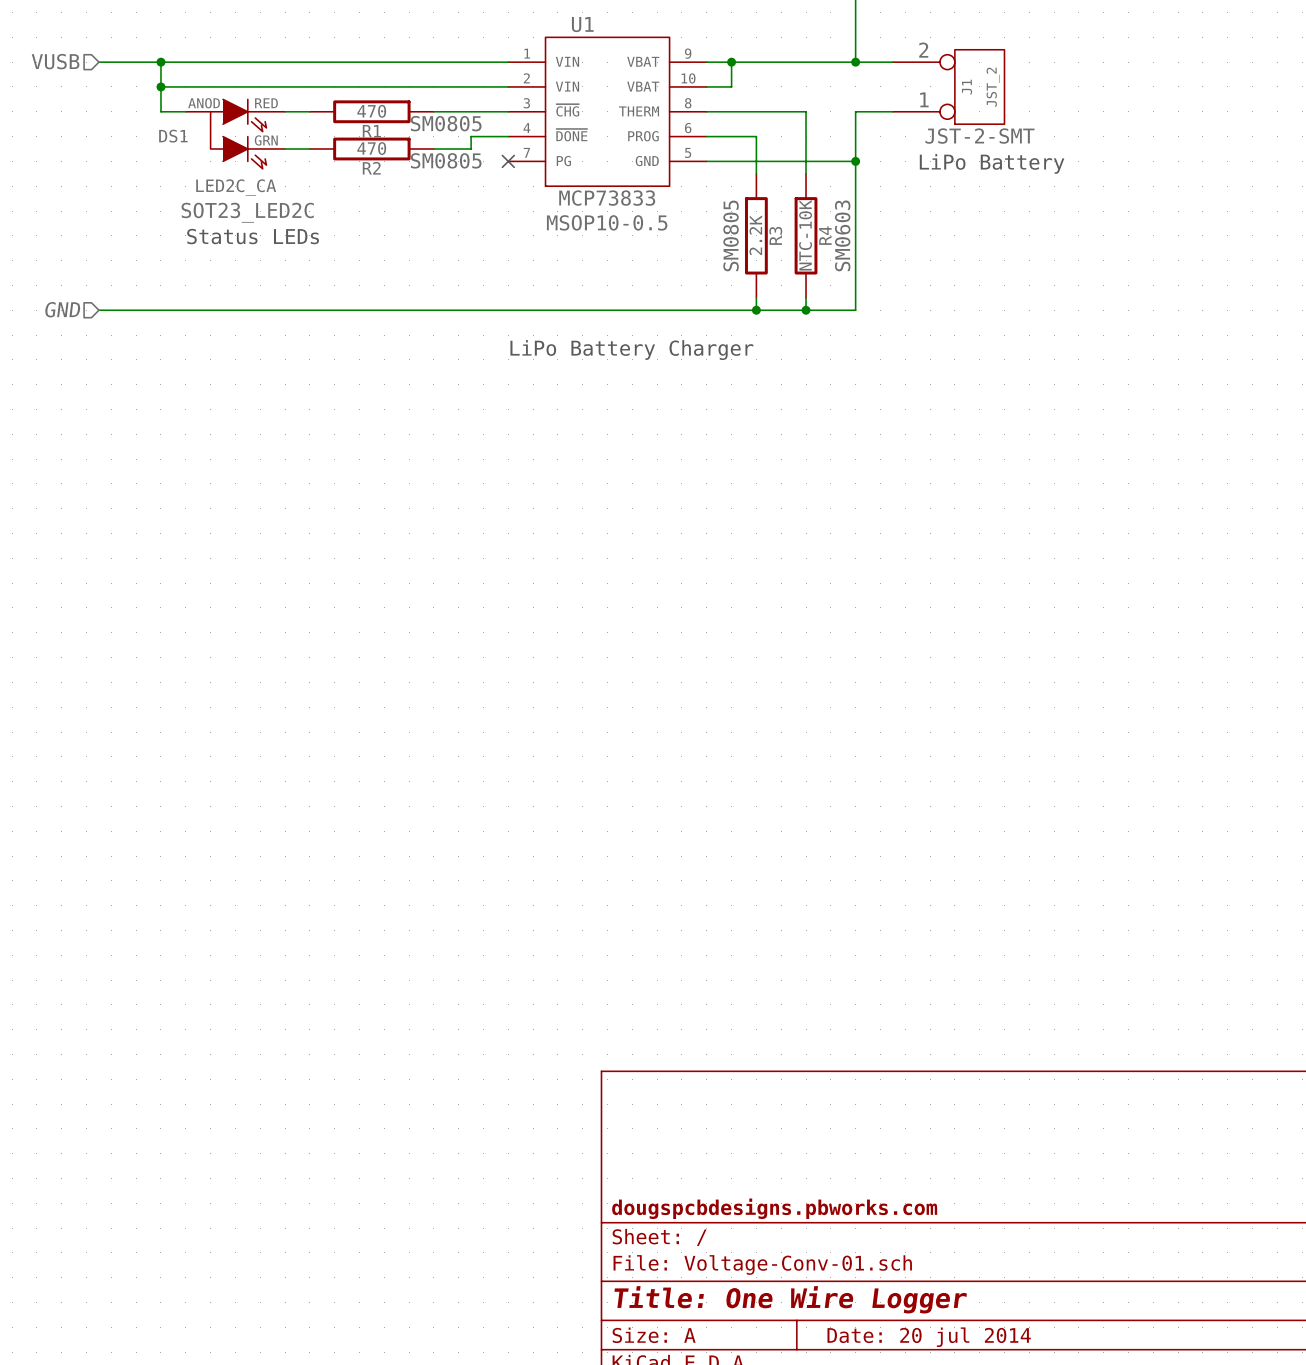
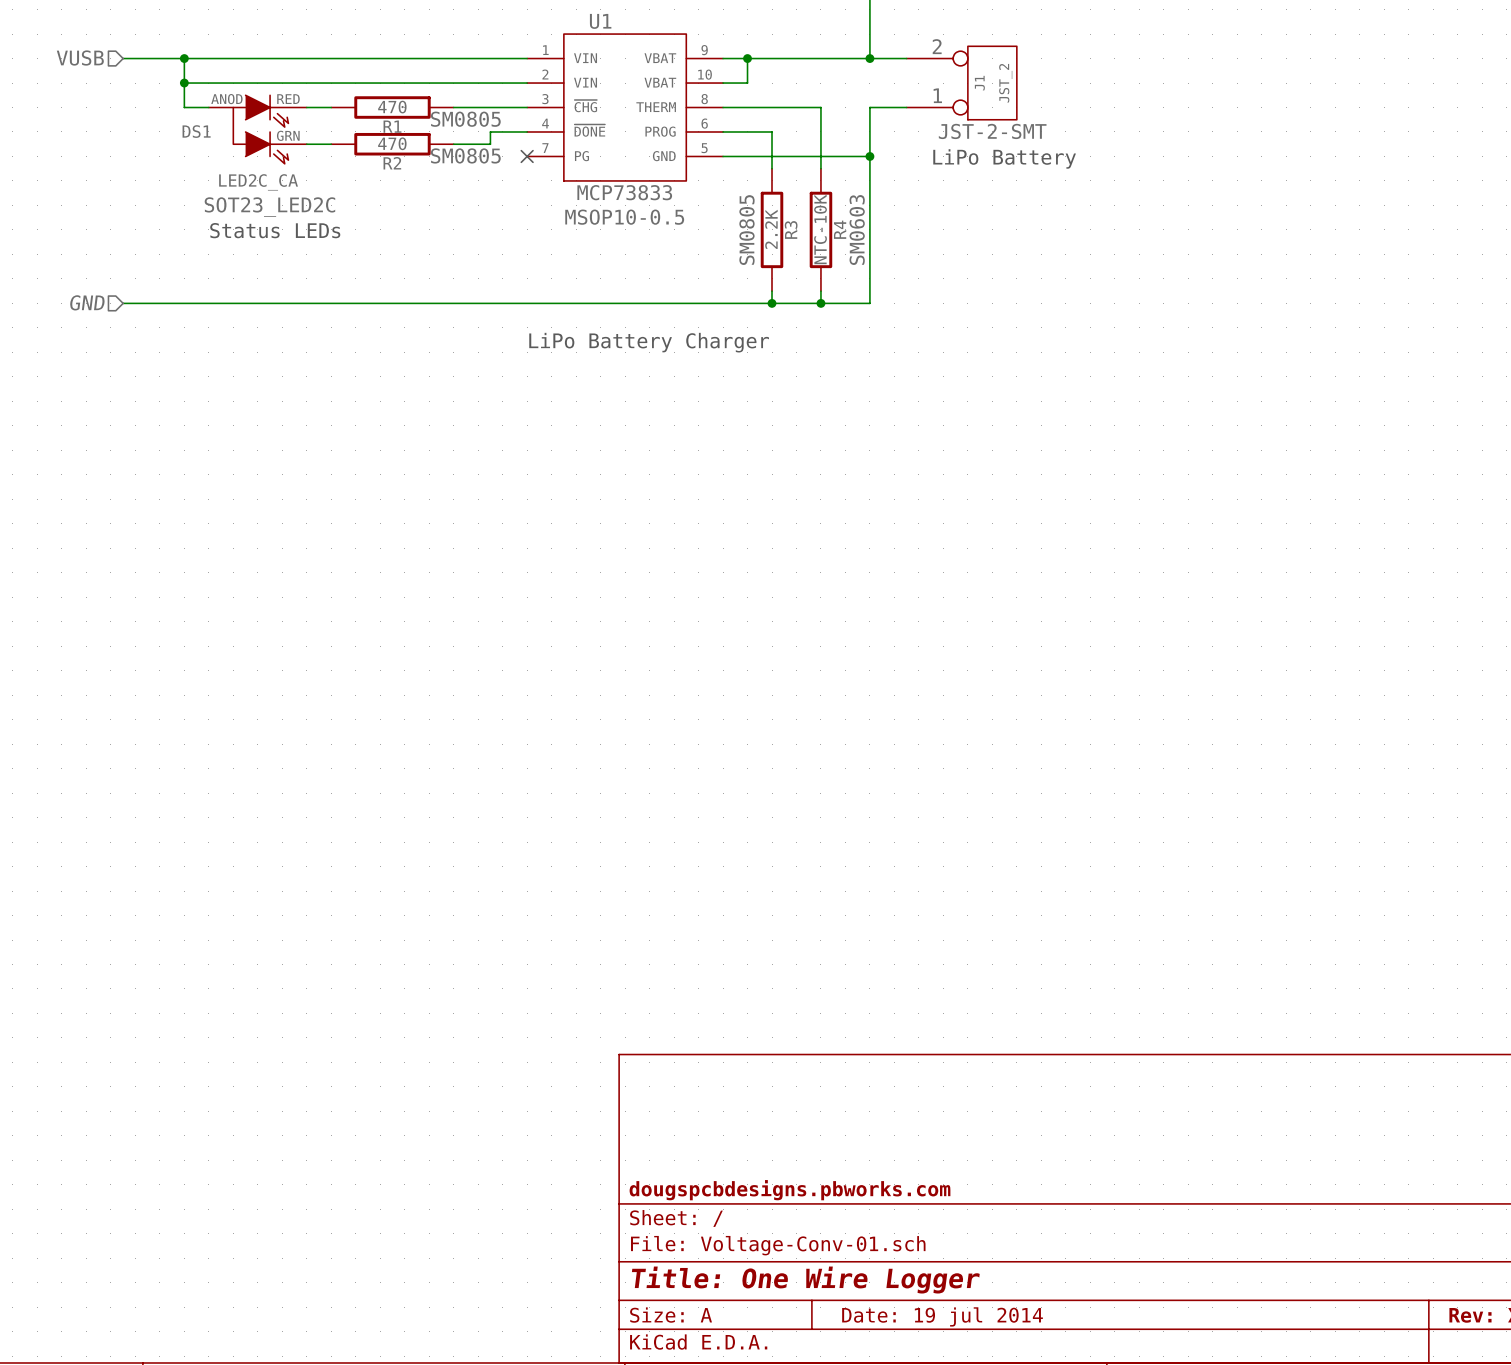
title block: Date: 20 jul 2014 (929, 1337) -> Date: 19 jul 2014 (942, 1316)

